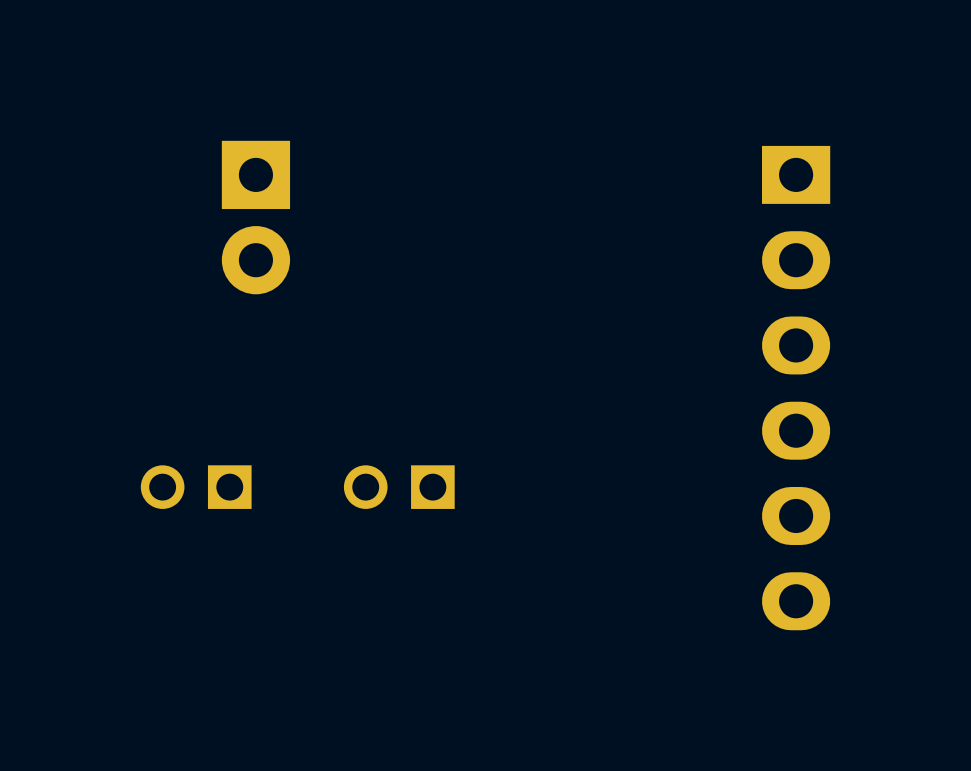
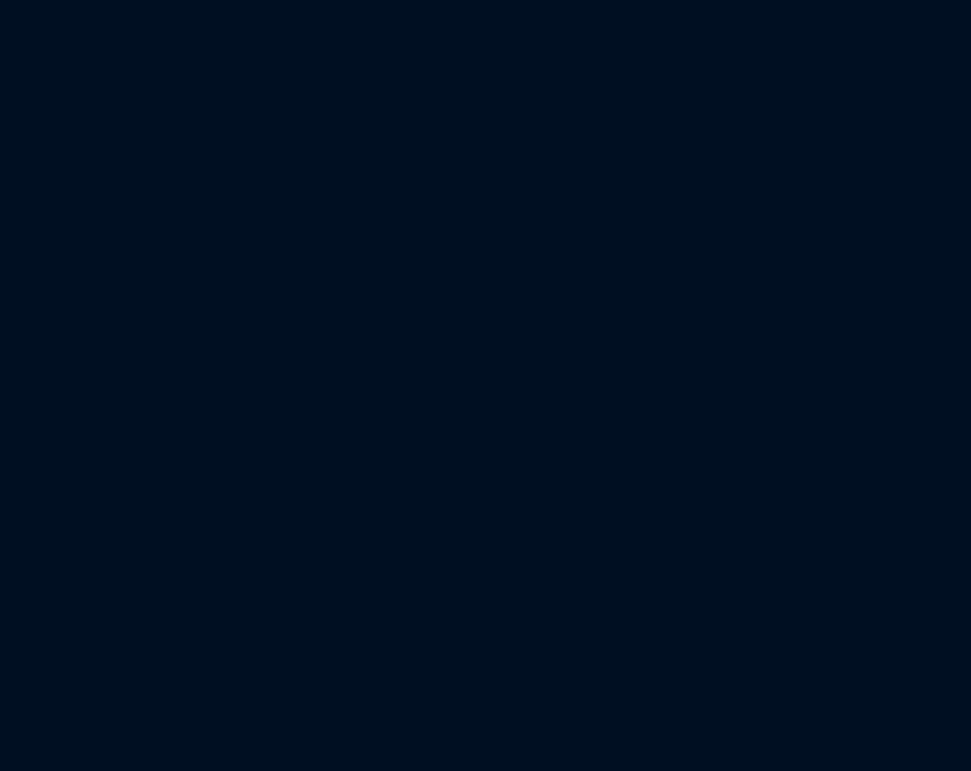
part: (255, 217) -> none
part: (796, 388) -> none
part: (196, 487) -> none
part: (399, 487) -> none

